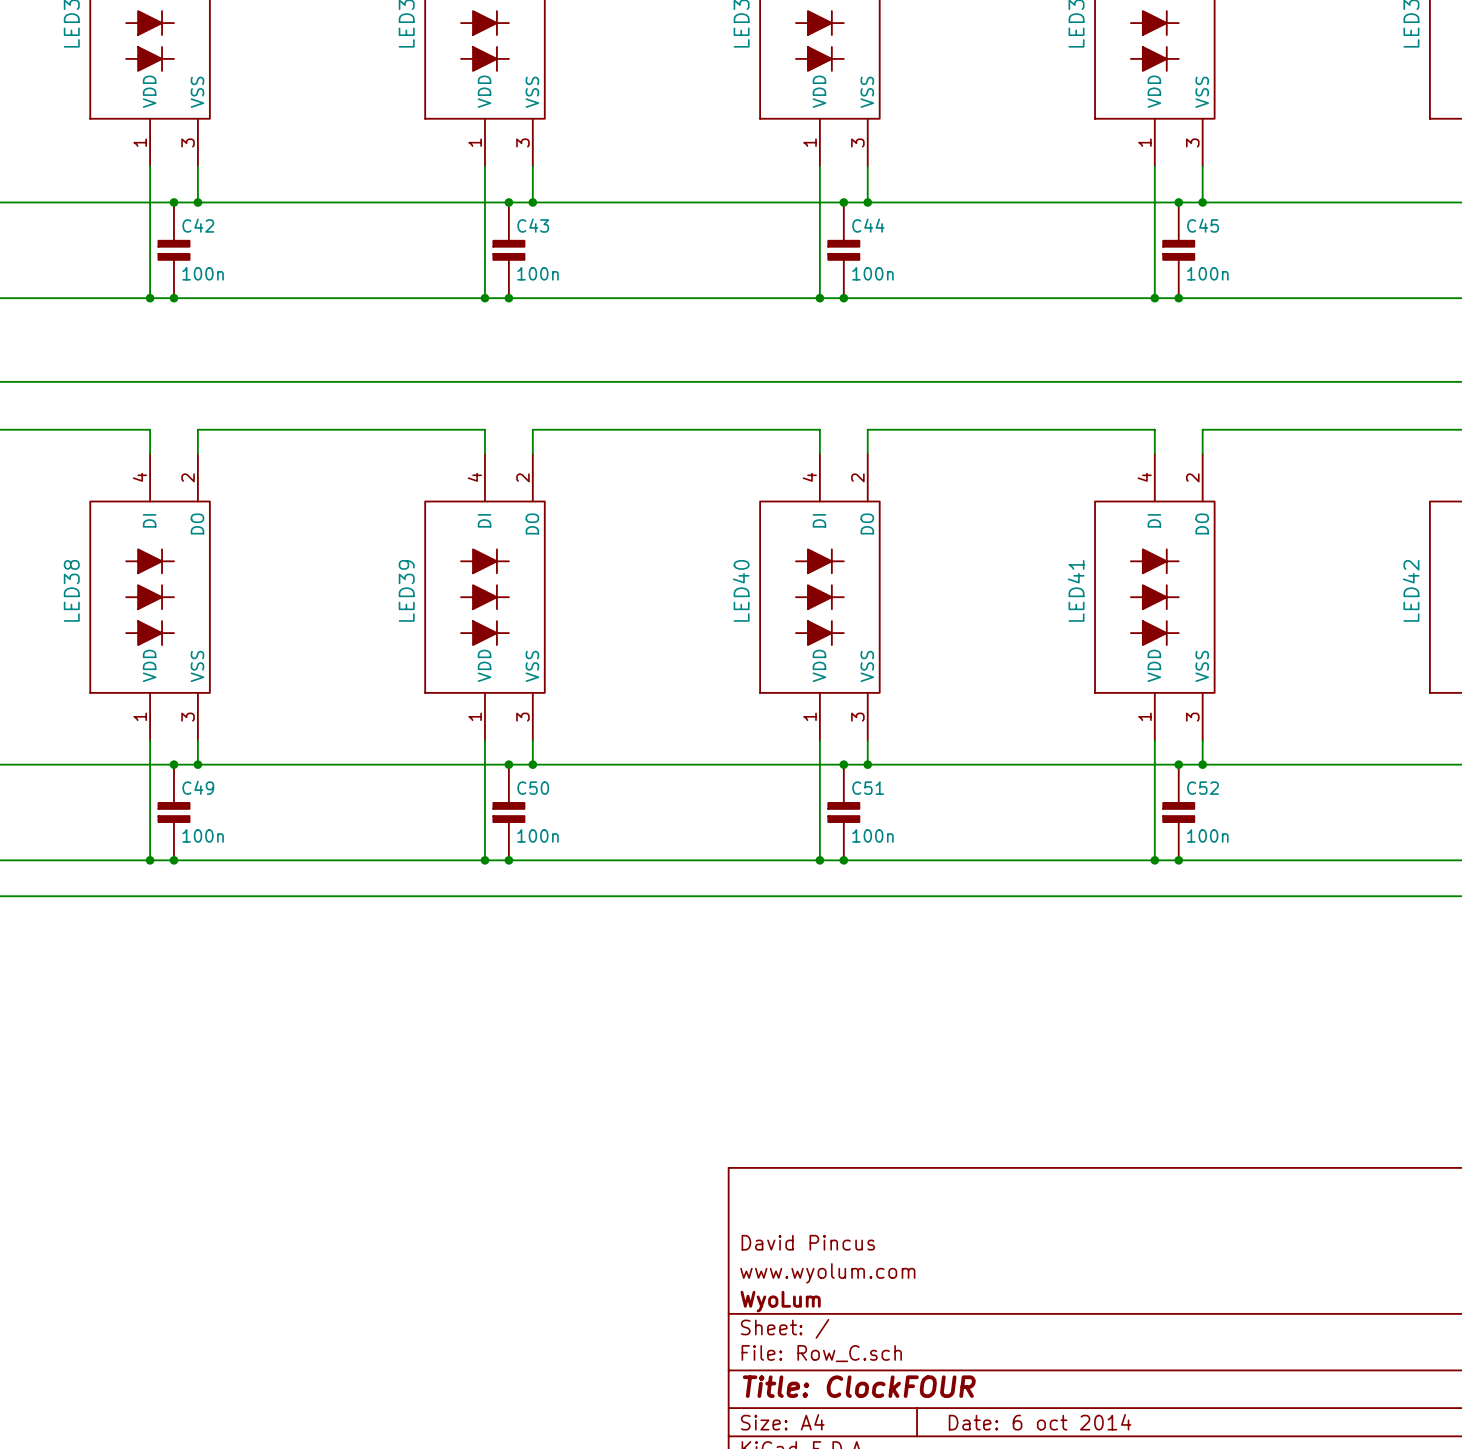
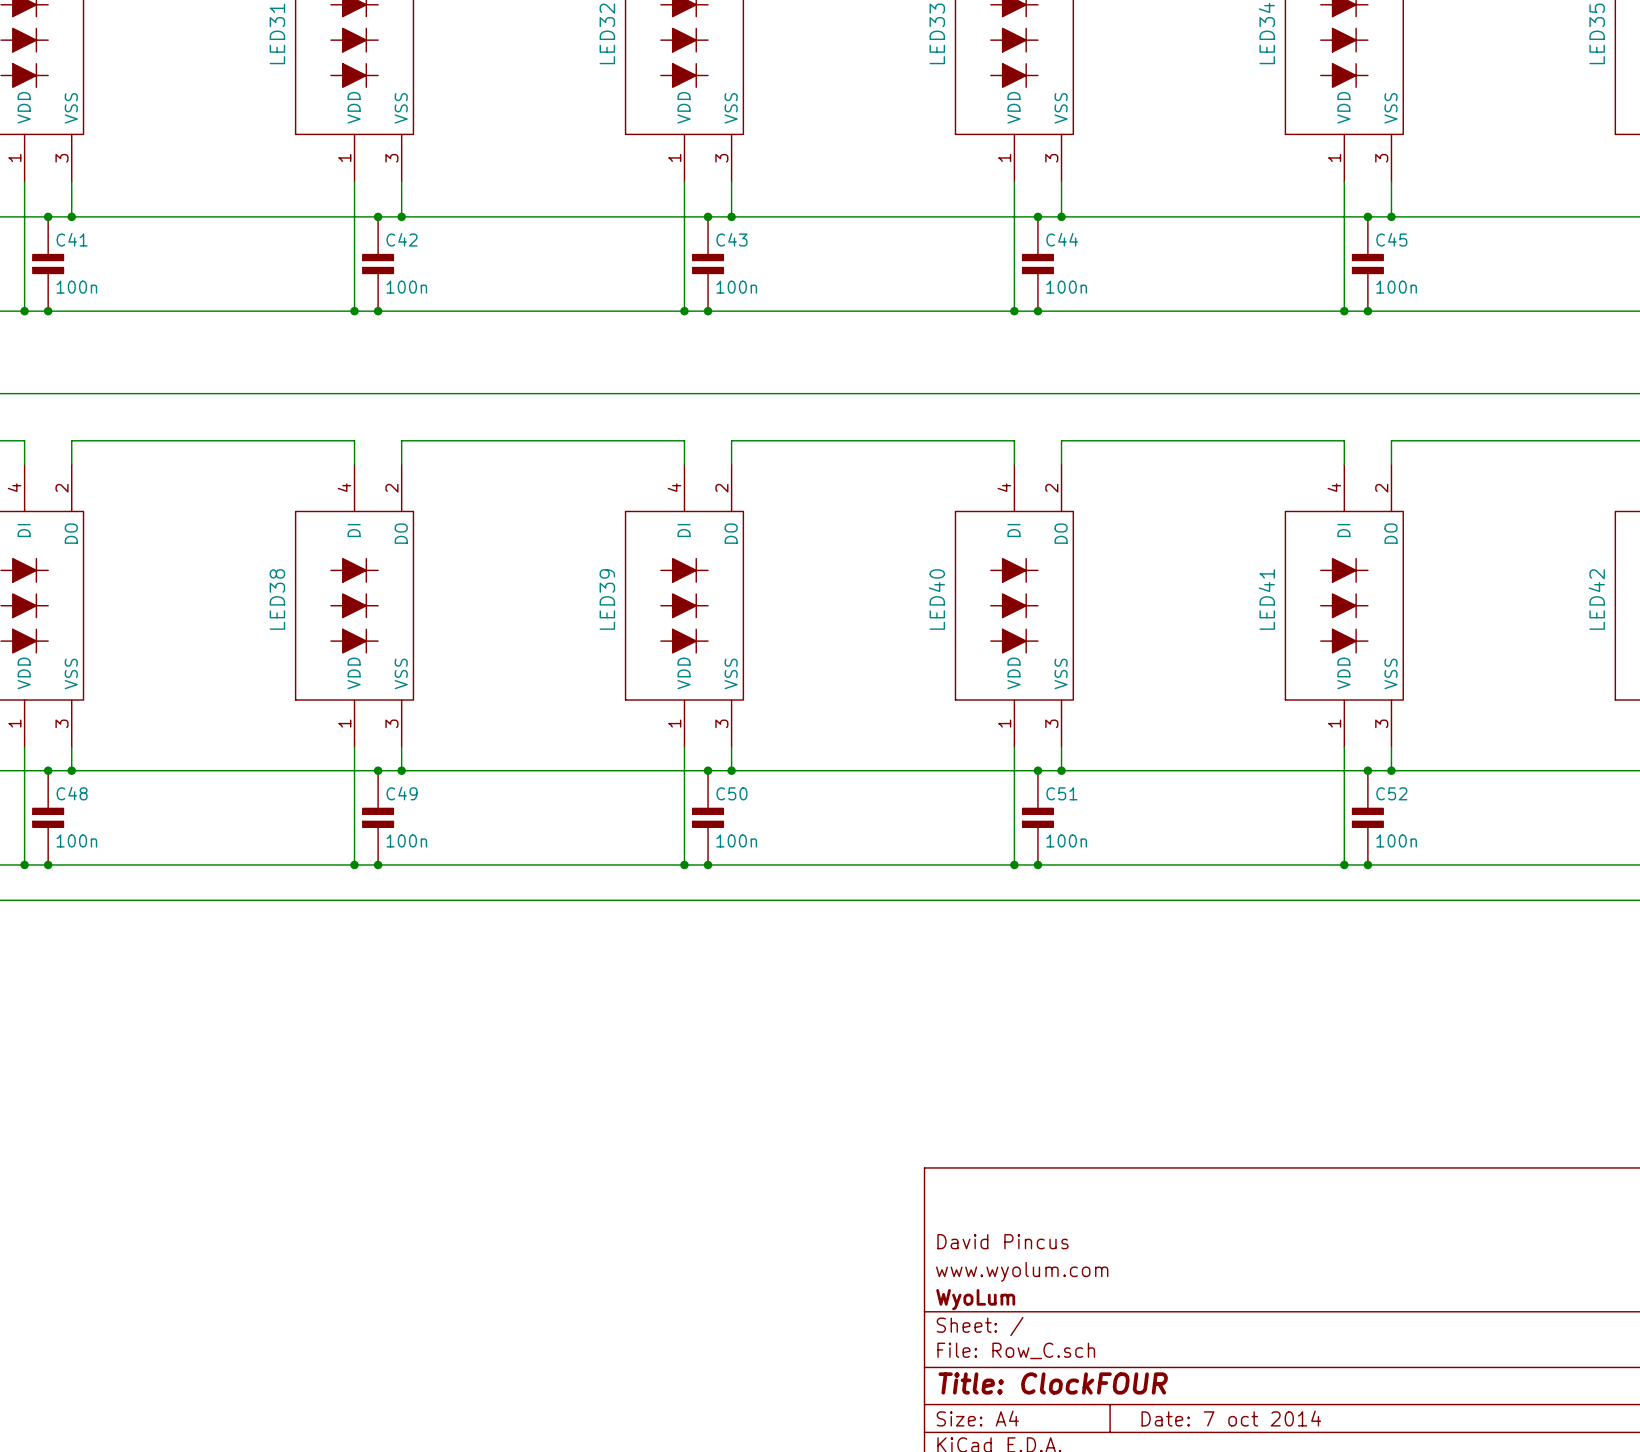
title block: Date: 6 oct 2014 (1040, 1422) -> Date: 7 oct 2014 (1231, 1418)

